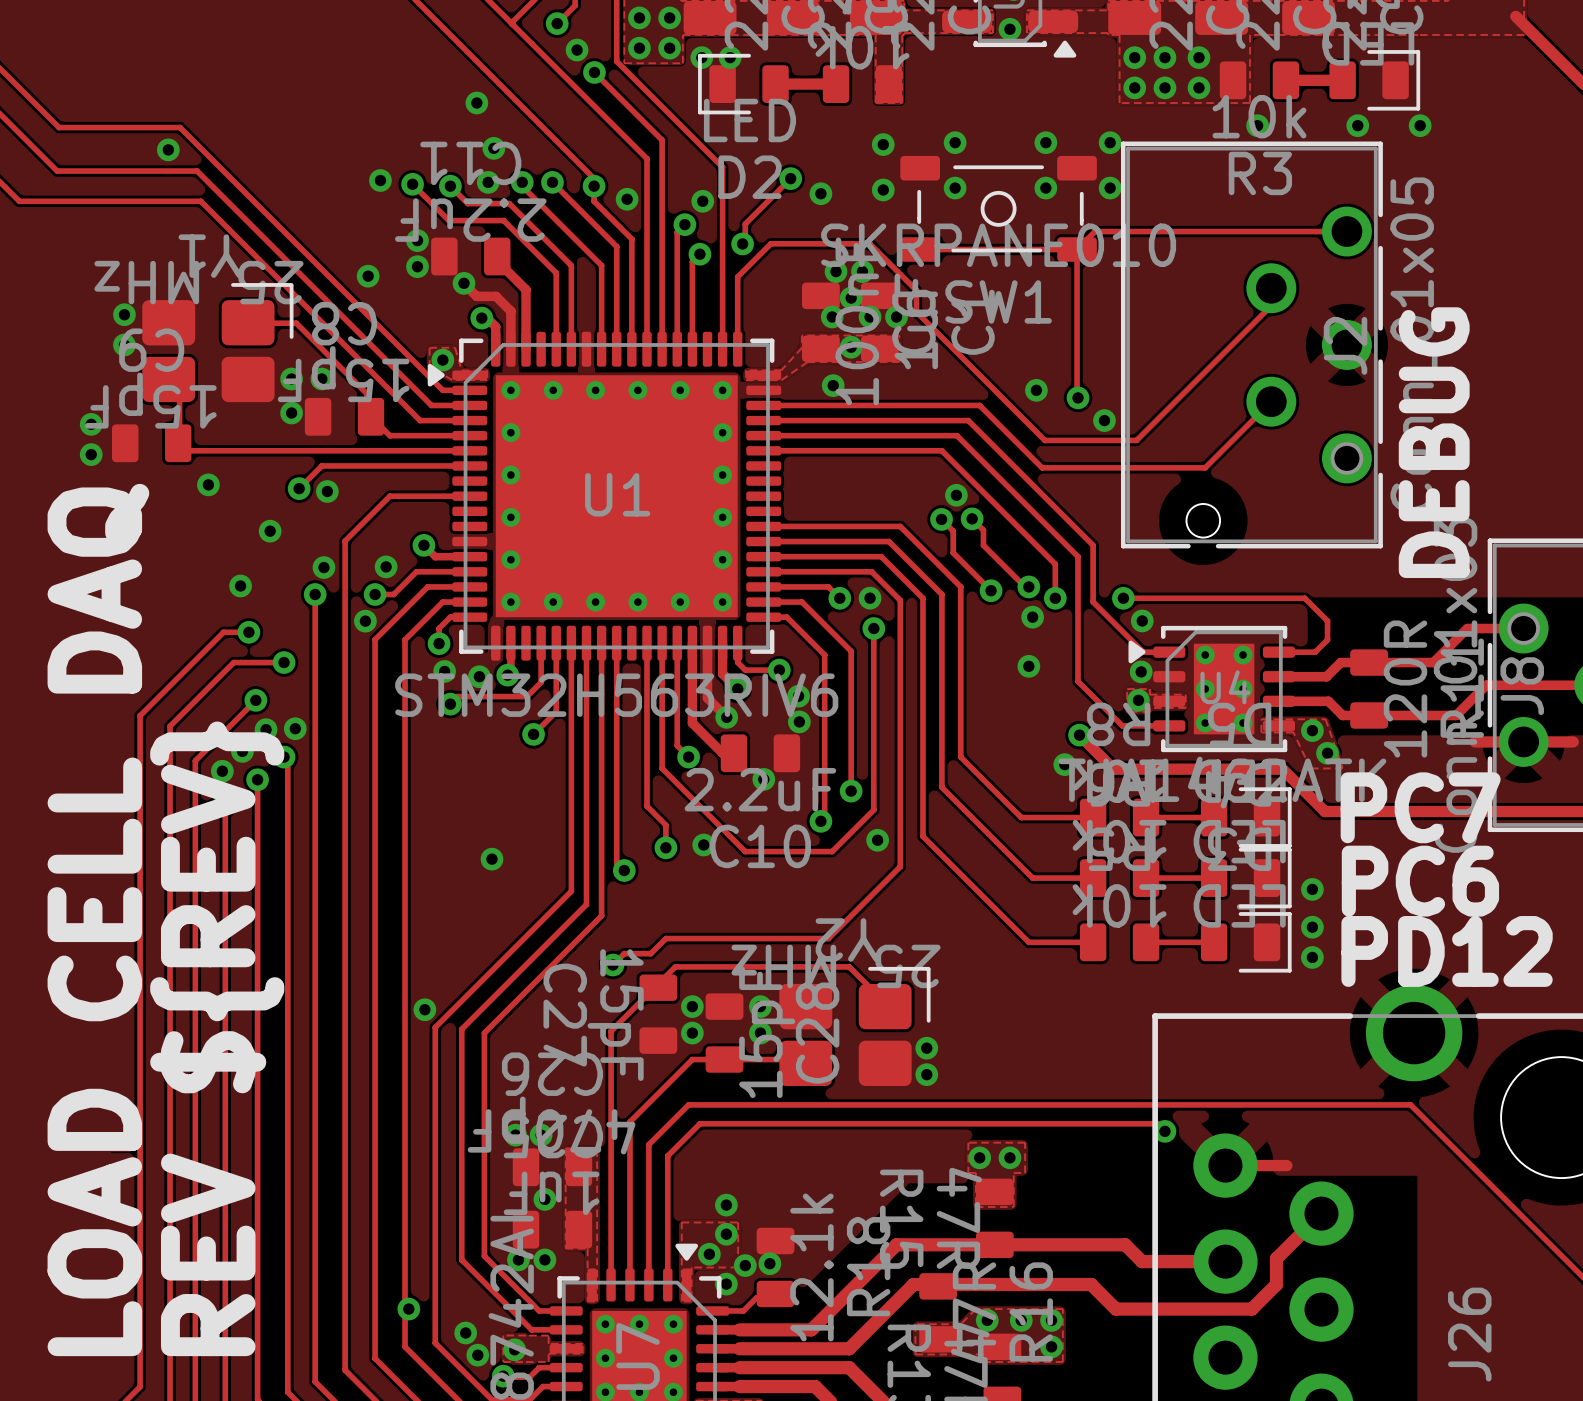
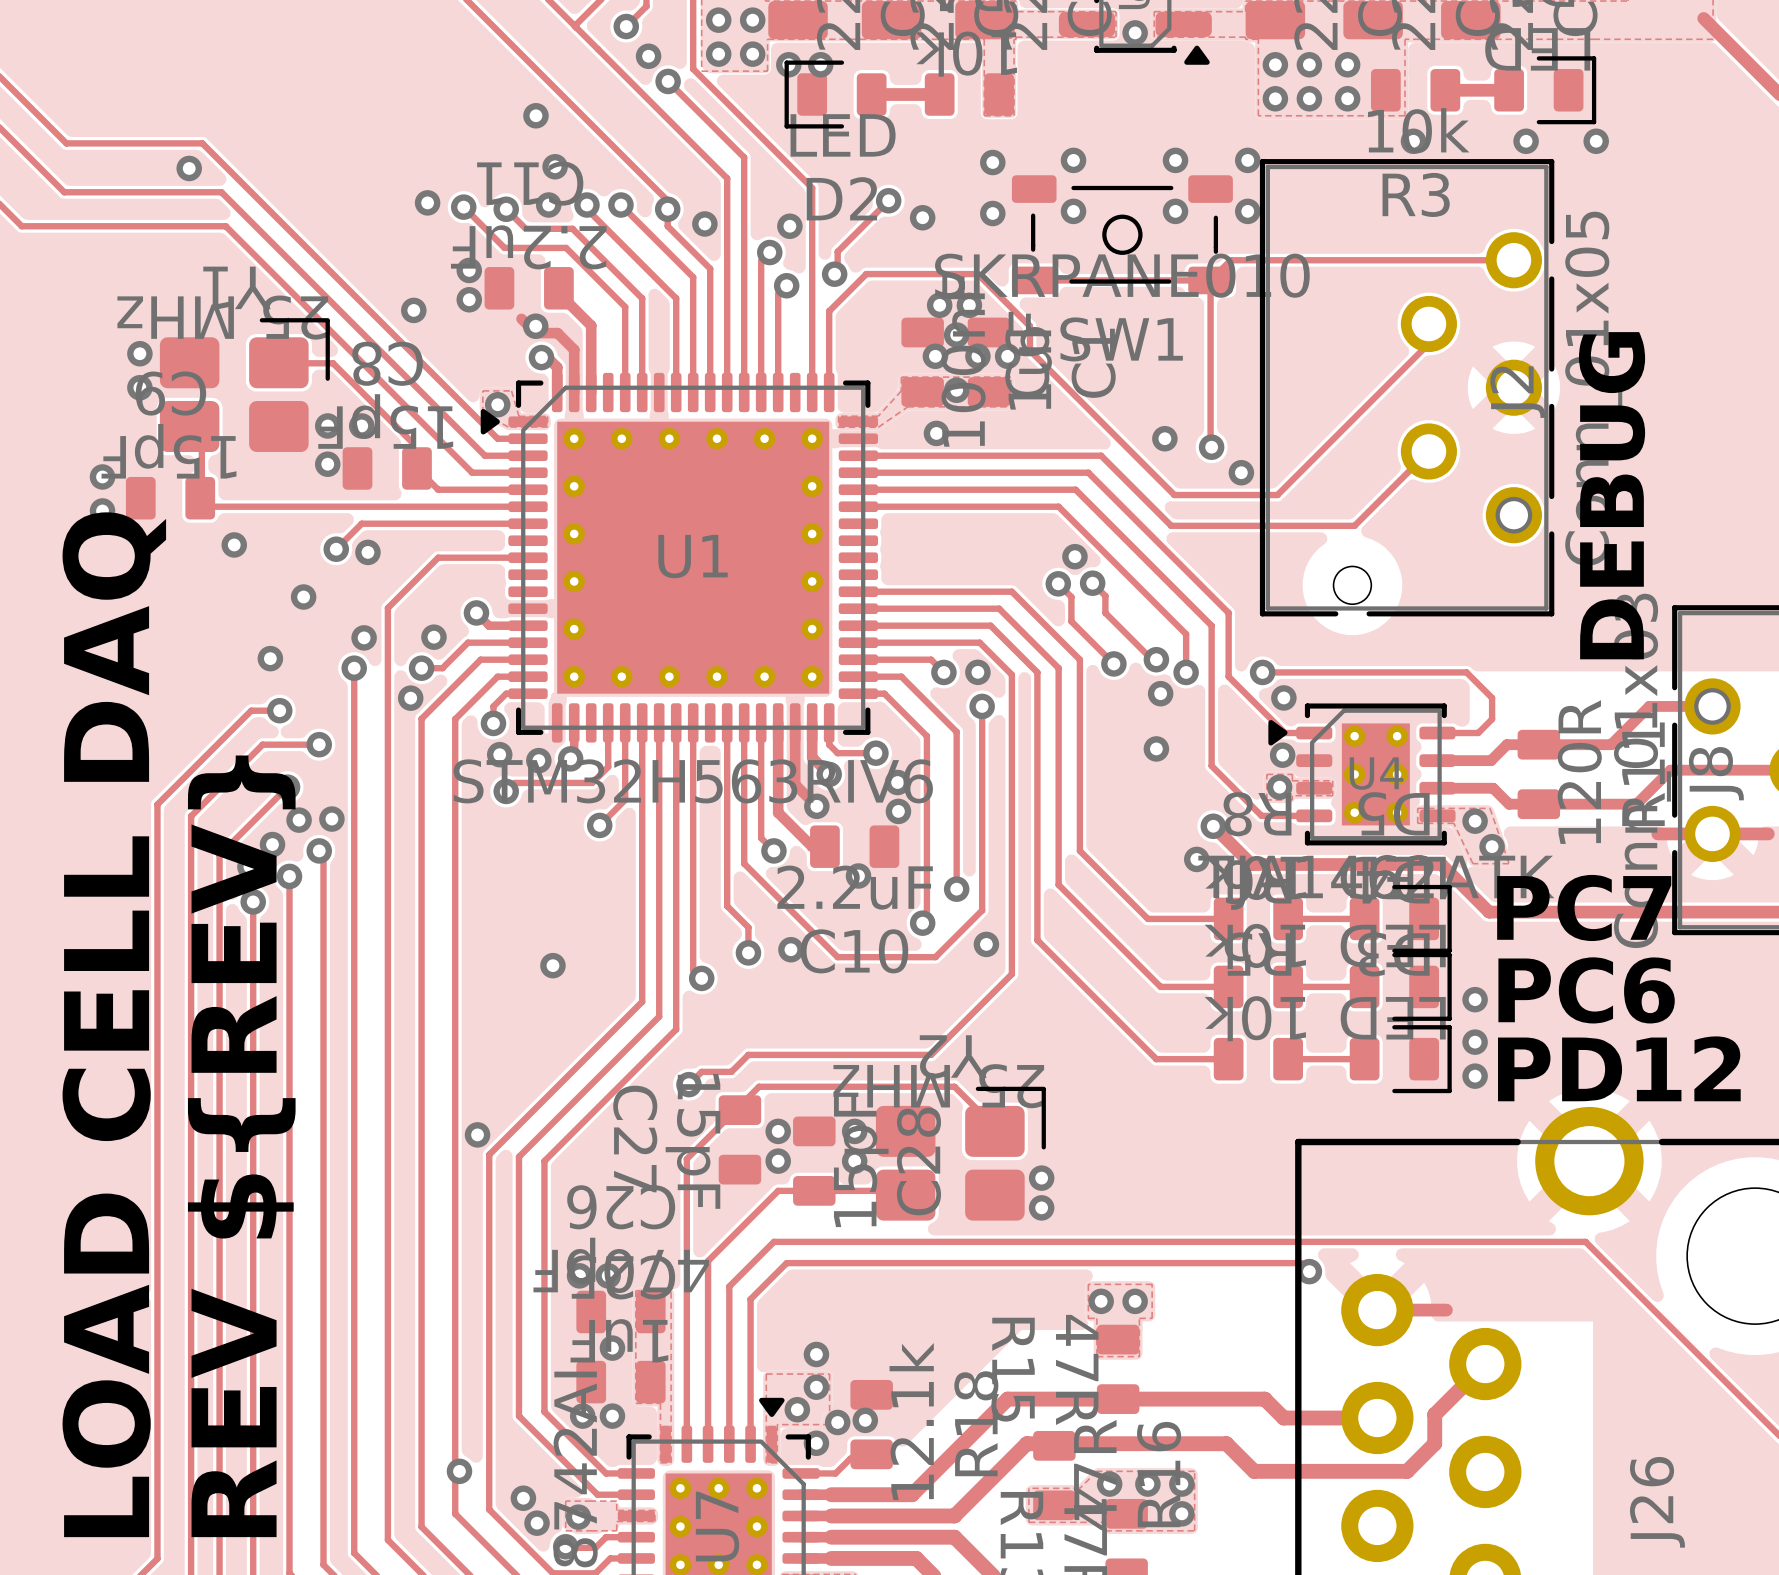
via position: (464, 283) -> (535, 326)

